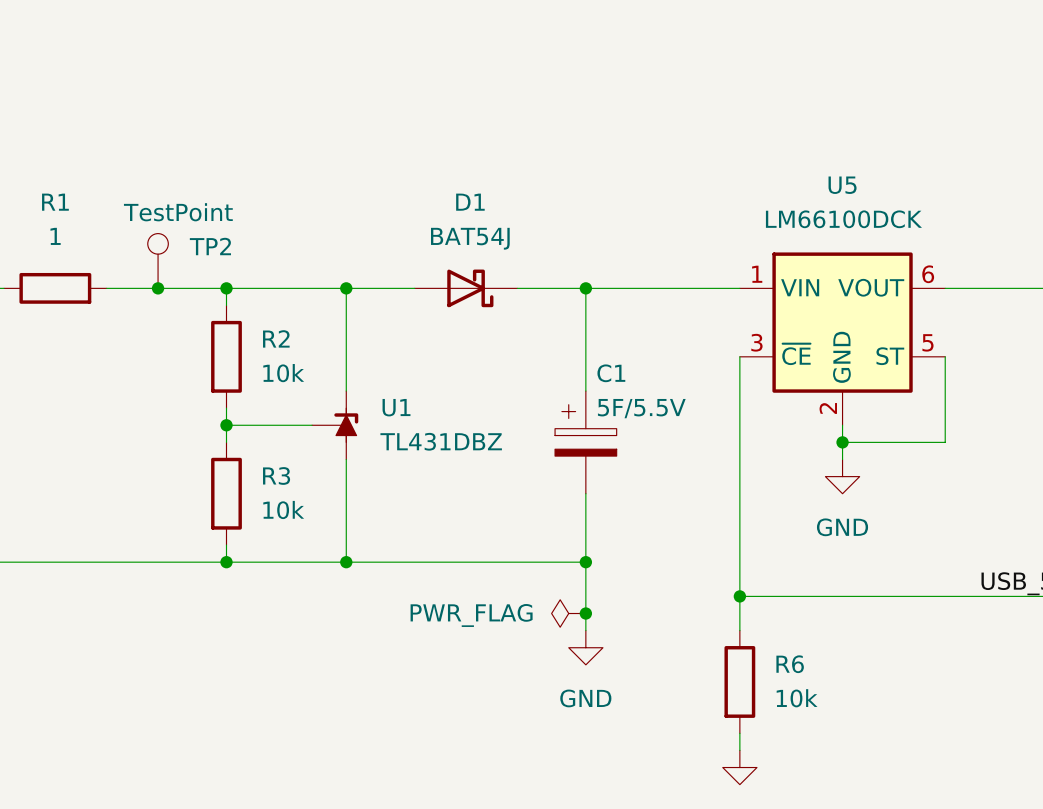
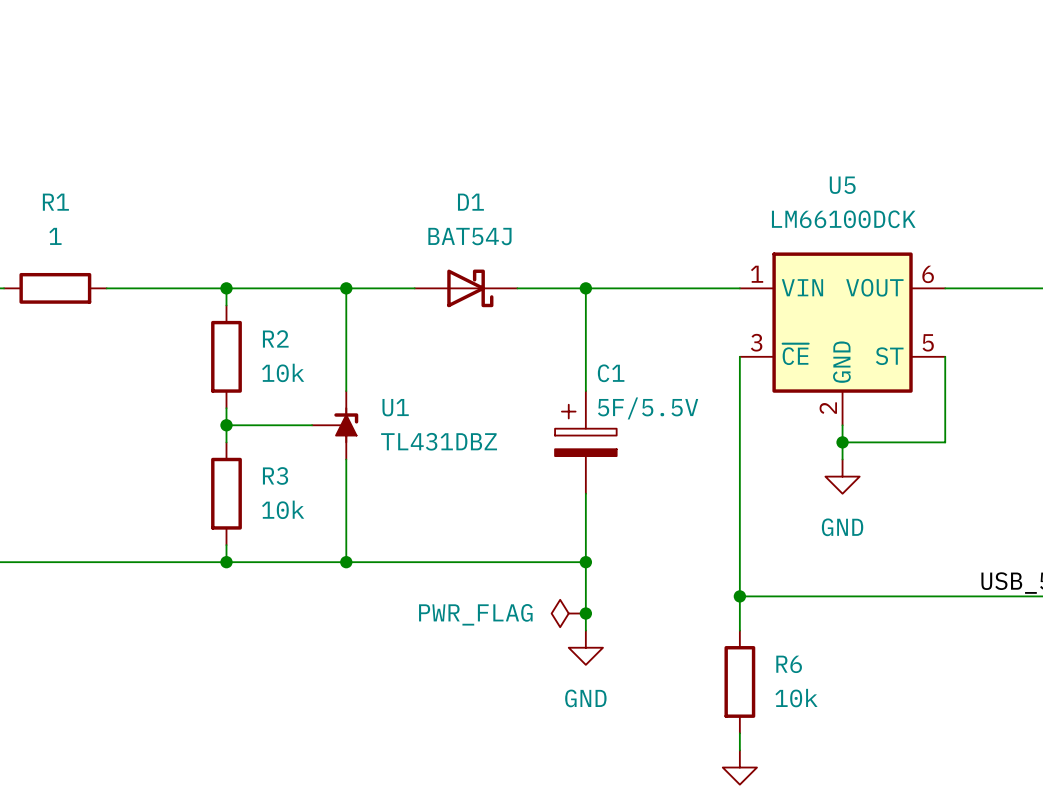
TP2: TestPoint (158, 260) -> none
junction: (158, 288) -> none

